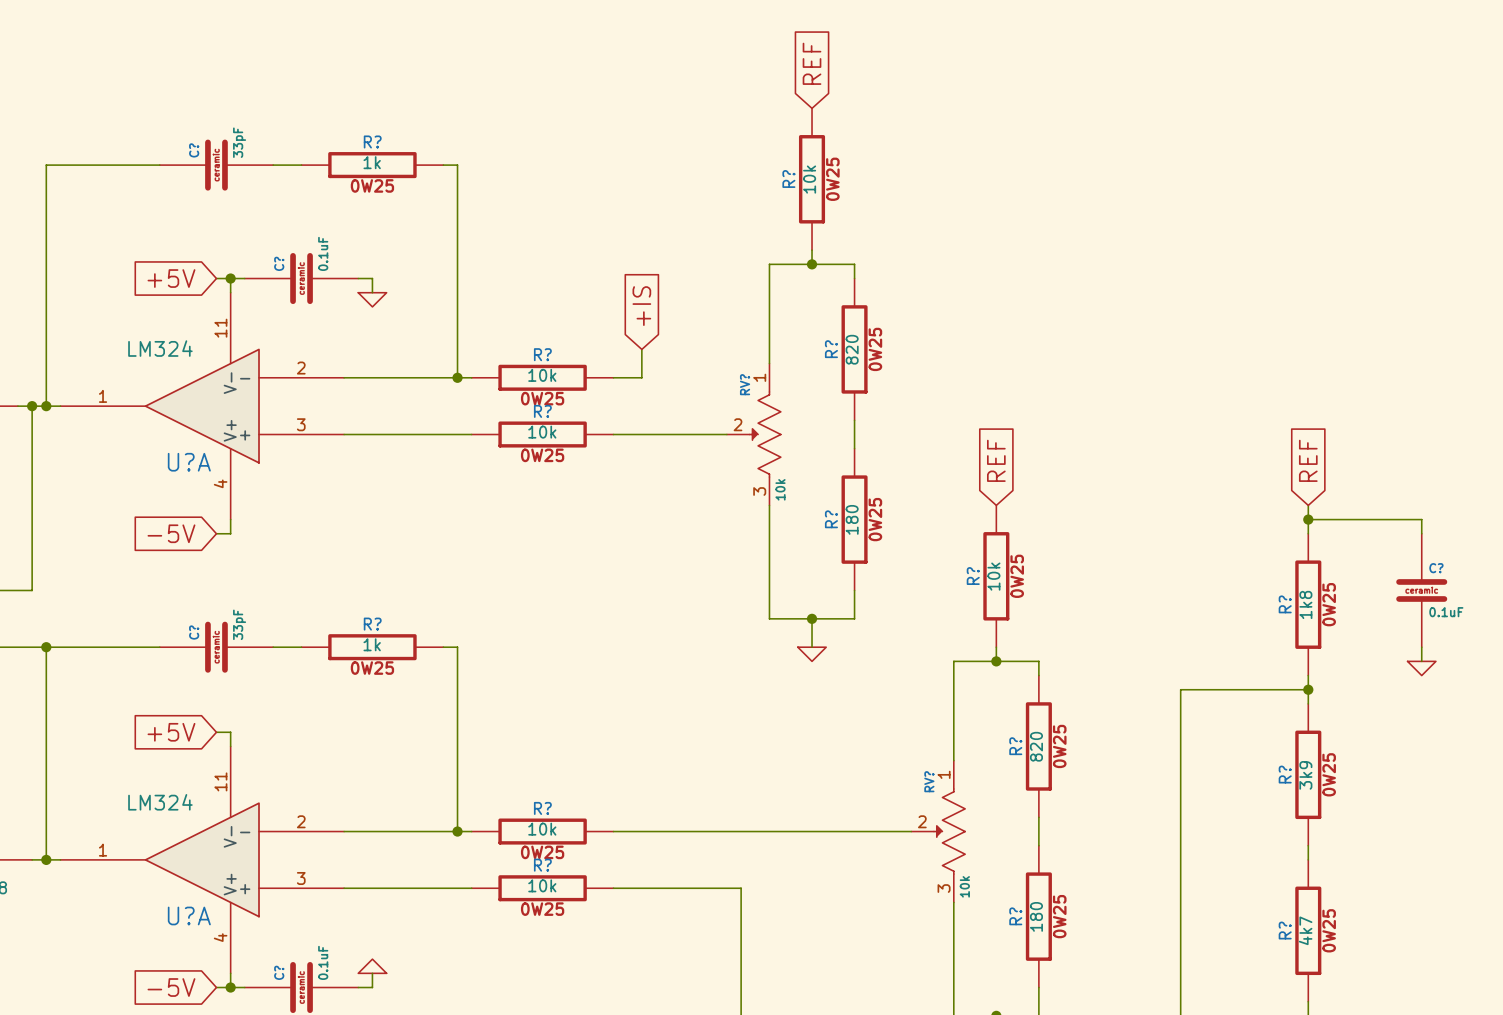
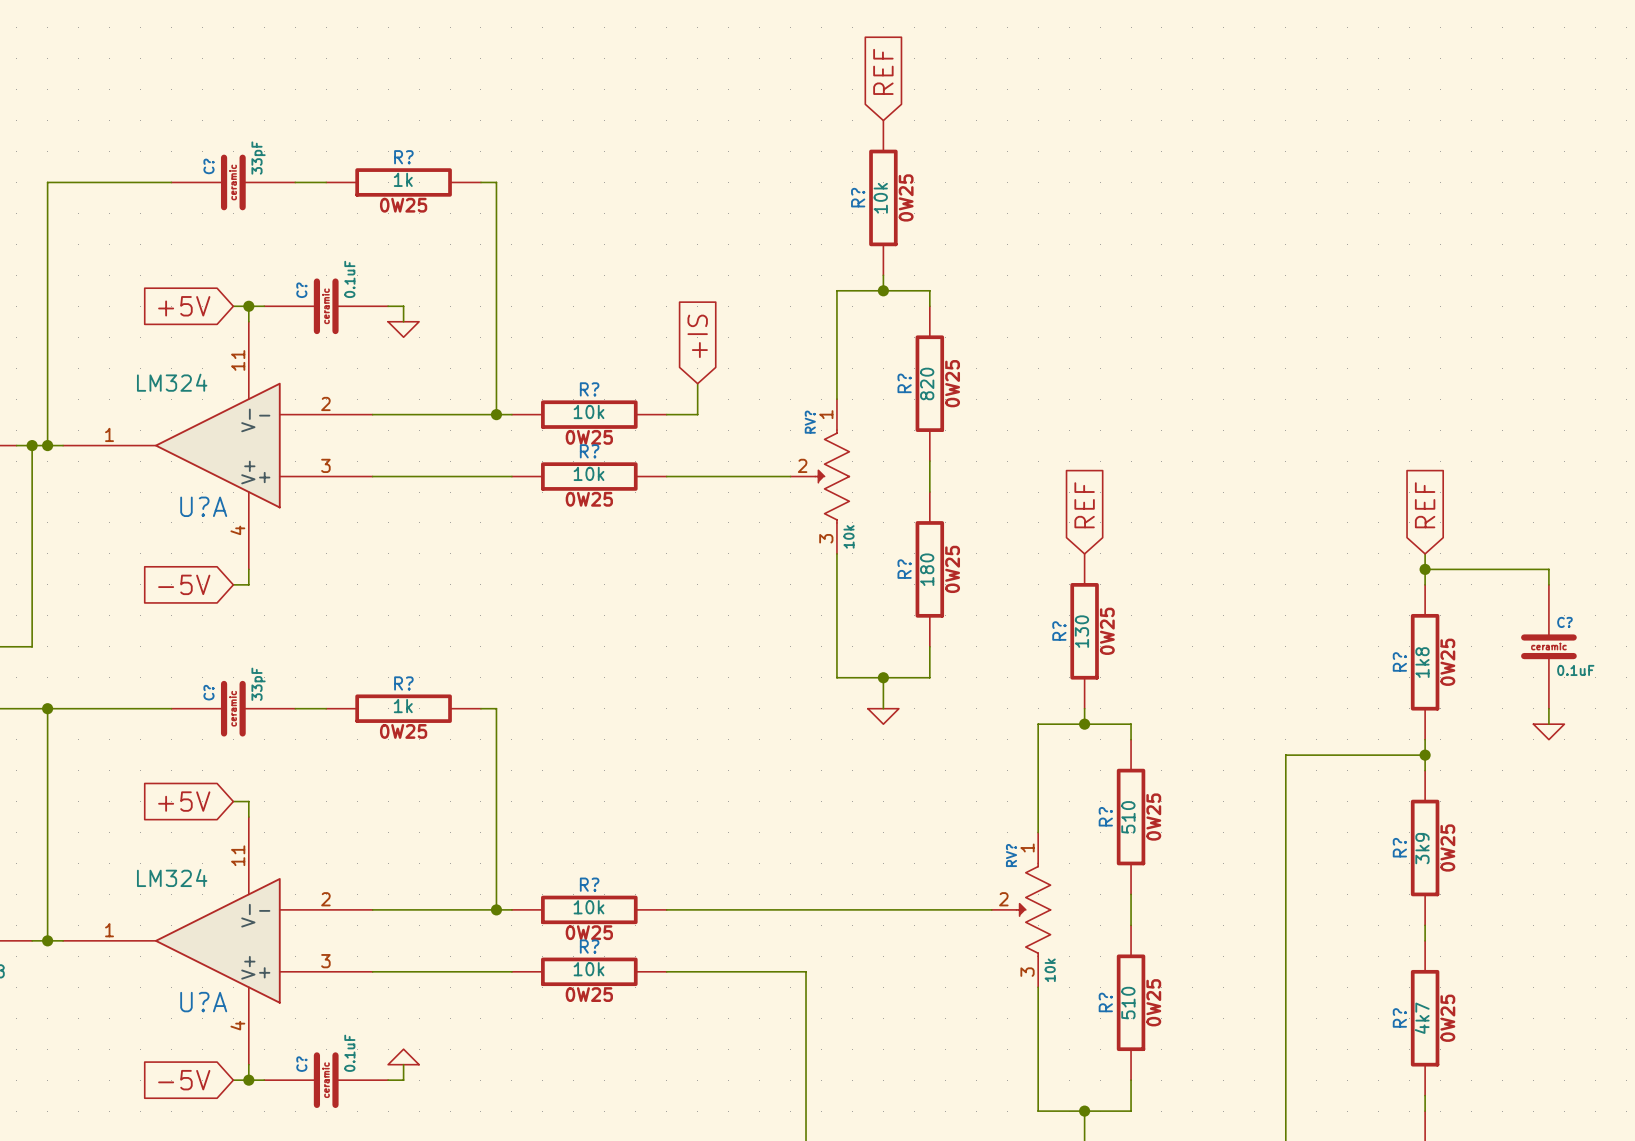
R? value: 10k (993, 576) -> 130 (1081, 631)
R? value: 820 (1036, 746) -> 510 (1128, 817)
R? value: 180 (1036, 916) -> 510 (1128, 1003)

